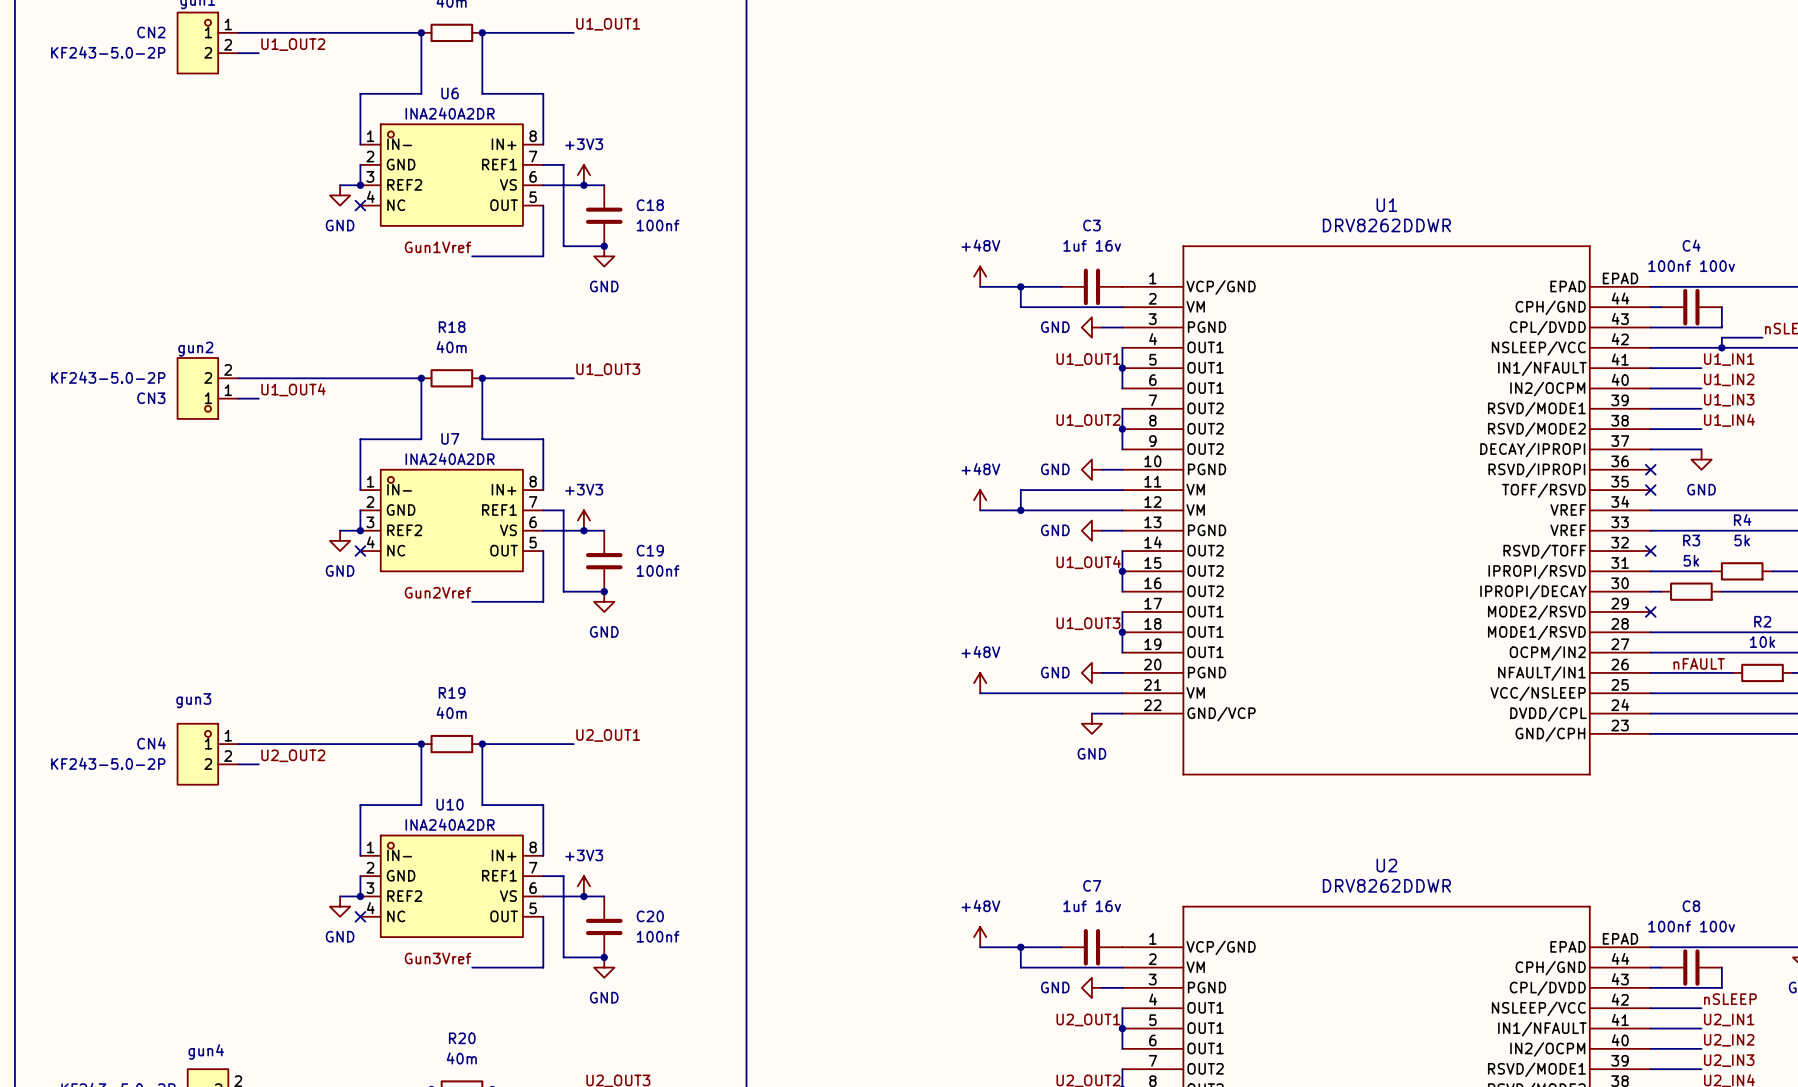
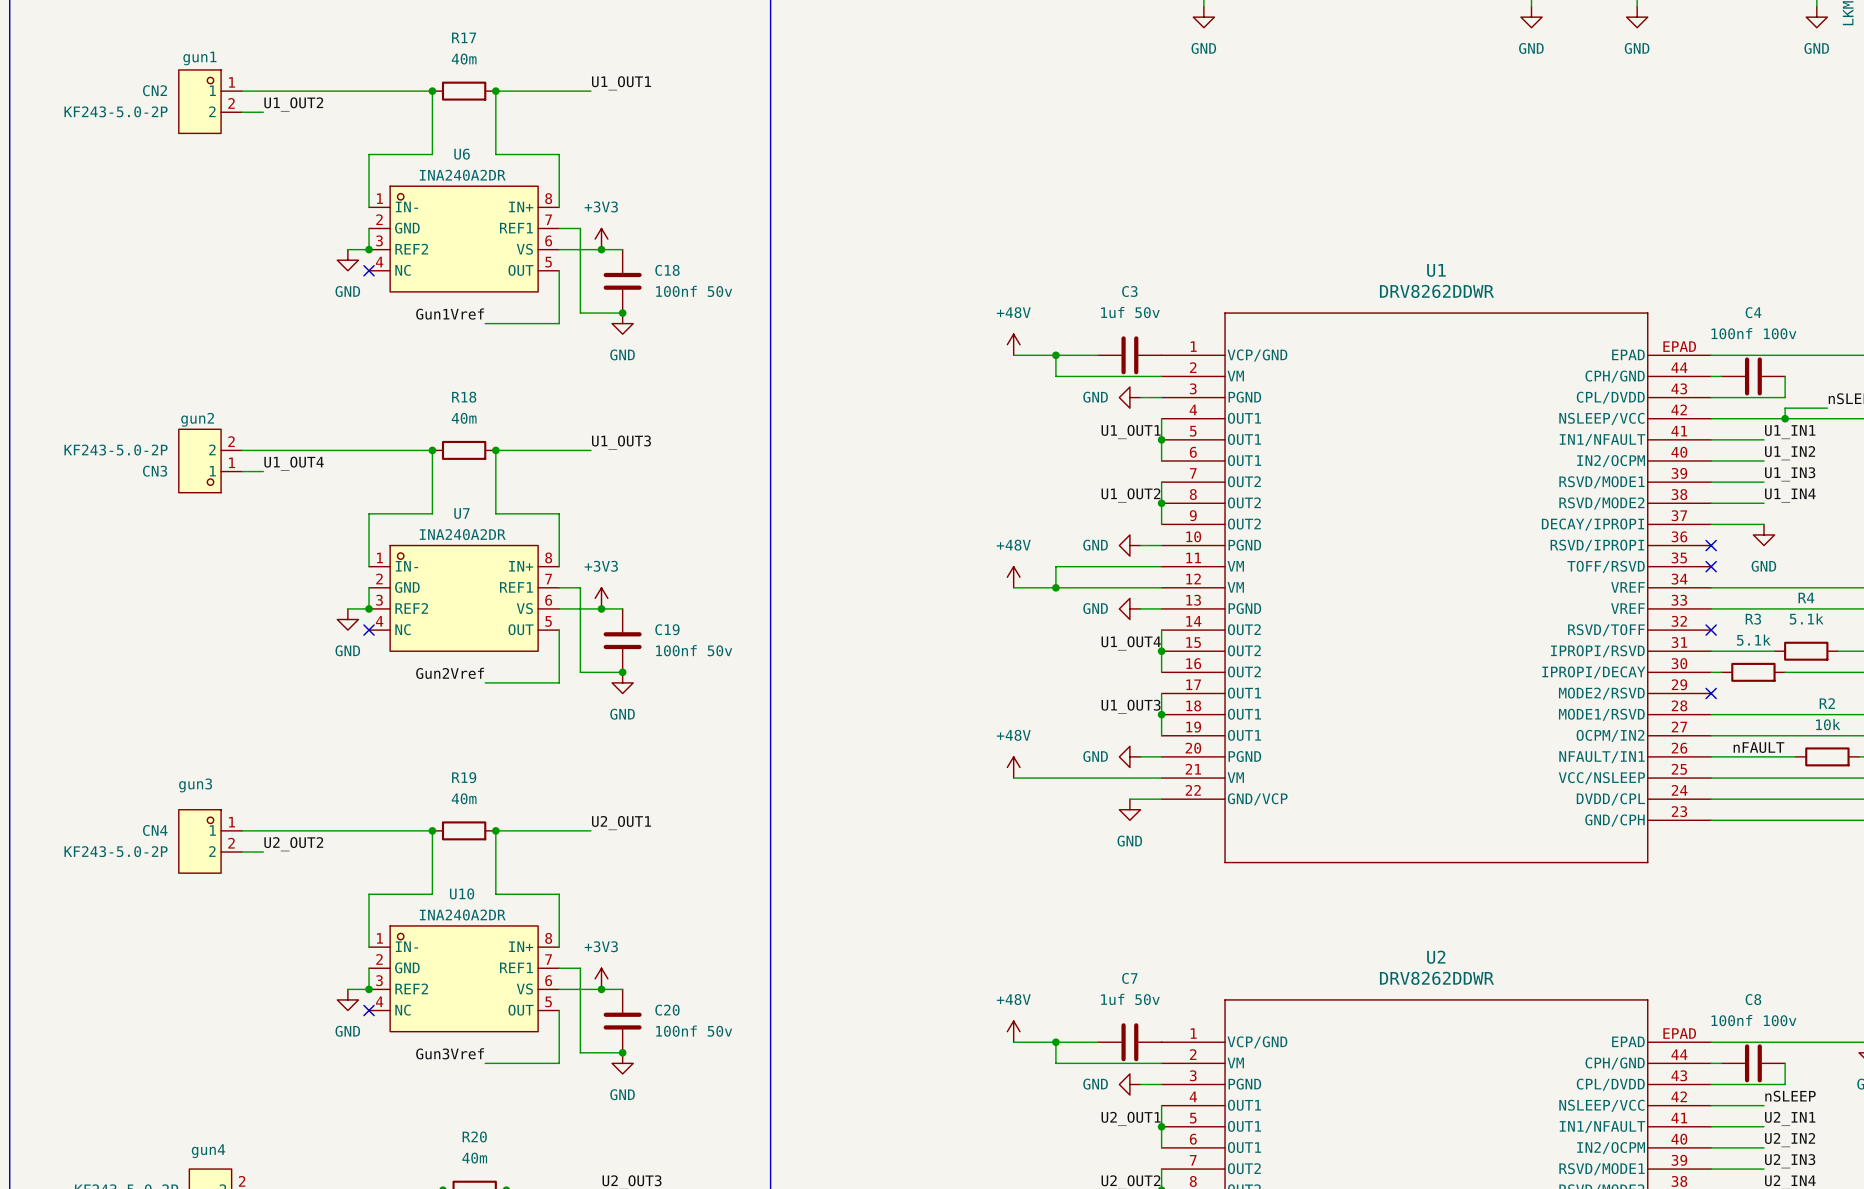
C18 value: 100nf (658, 225) -> 100nf 50v (694, 291)
C3 value: 1uf 16v (1092, 245) -> 1uf 50v (1130, 312)
R4 value: 5k (1742, 540) -> 5.1k (1806, 619)
R3 value: 5k (1691, 560) -> 5.1k (1753, 640)
C19 value: 100nf (658, 570) -> 100nf 50v (694, 650)
C7 value: 1uf 16v (1092, 906) -> 1uf 50v (1130, 999)
C20 value: 100nf (658, 936) -> 100nf 50v (694, 1031)

